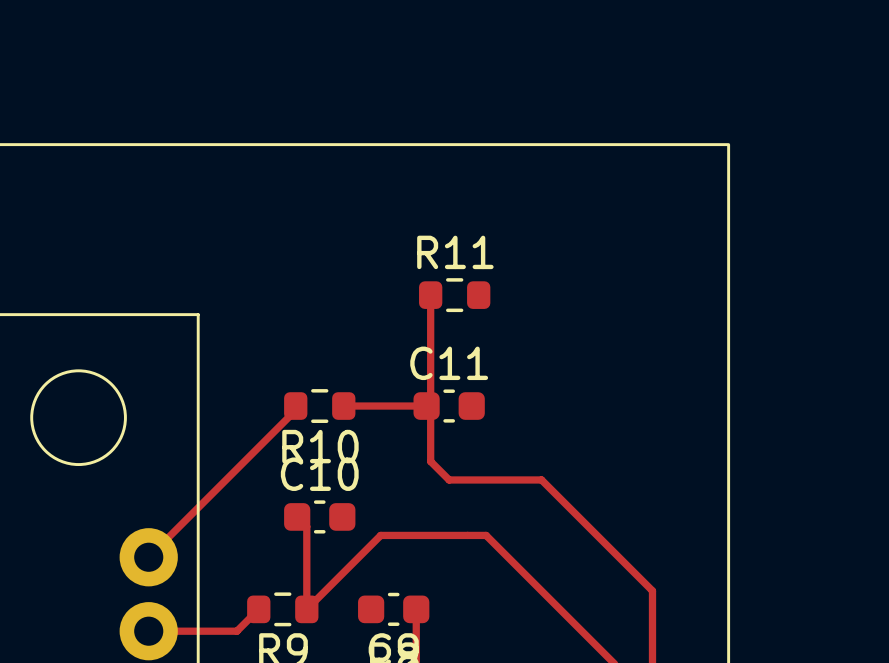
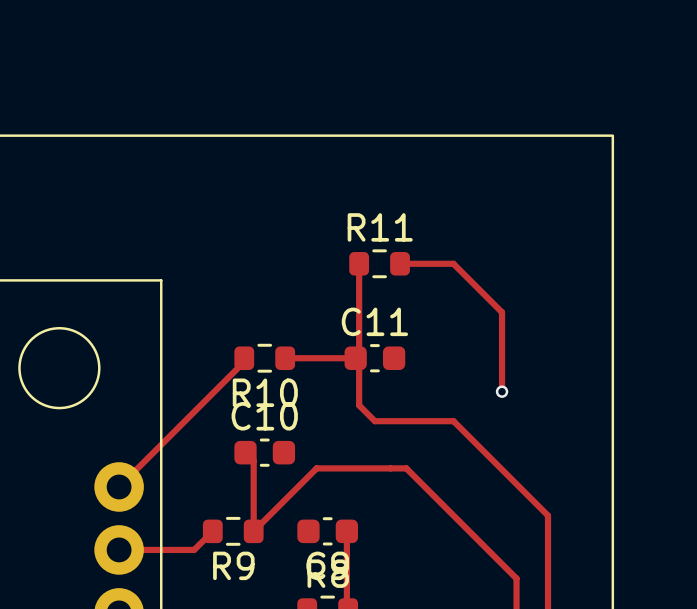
track: none -> (400, 263) (453, 263) (502, 312) (502, 391)
via: none -> (502, 391)

